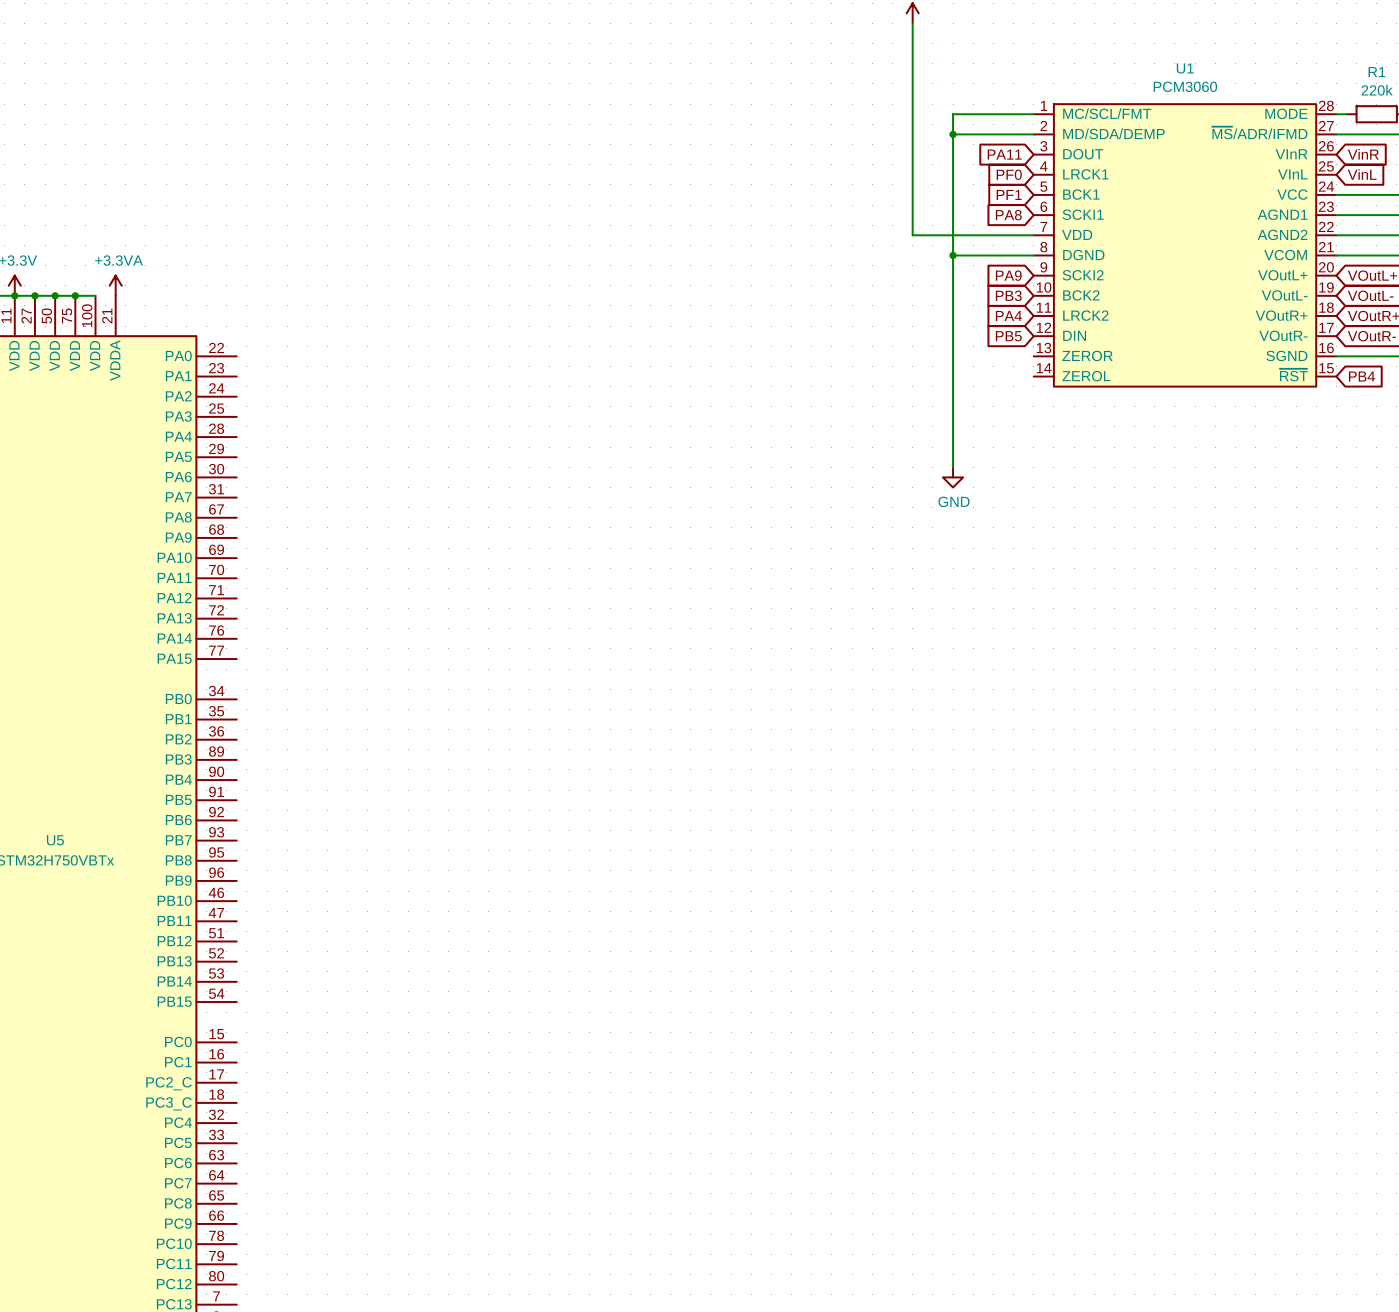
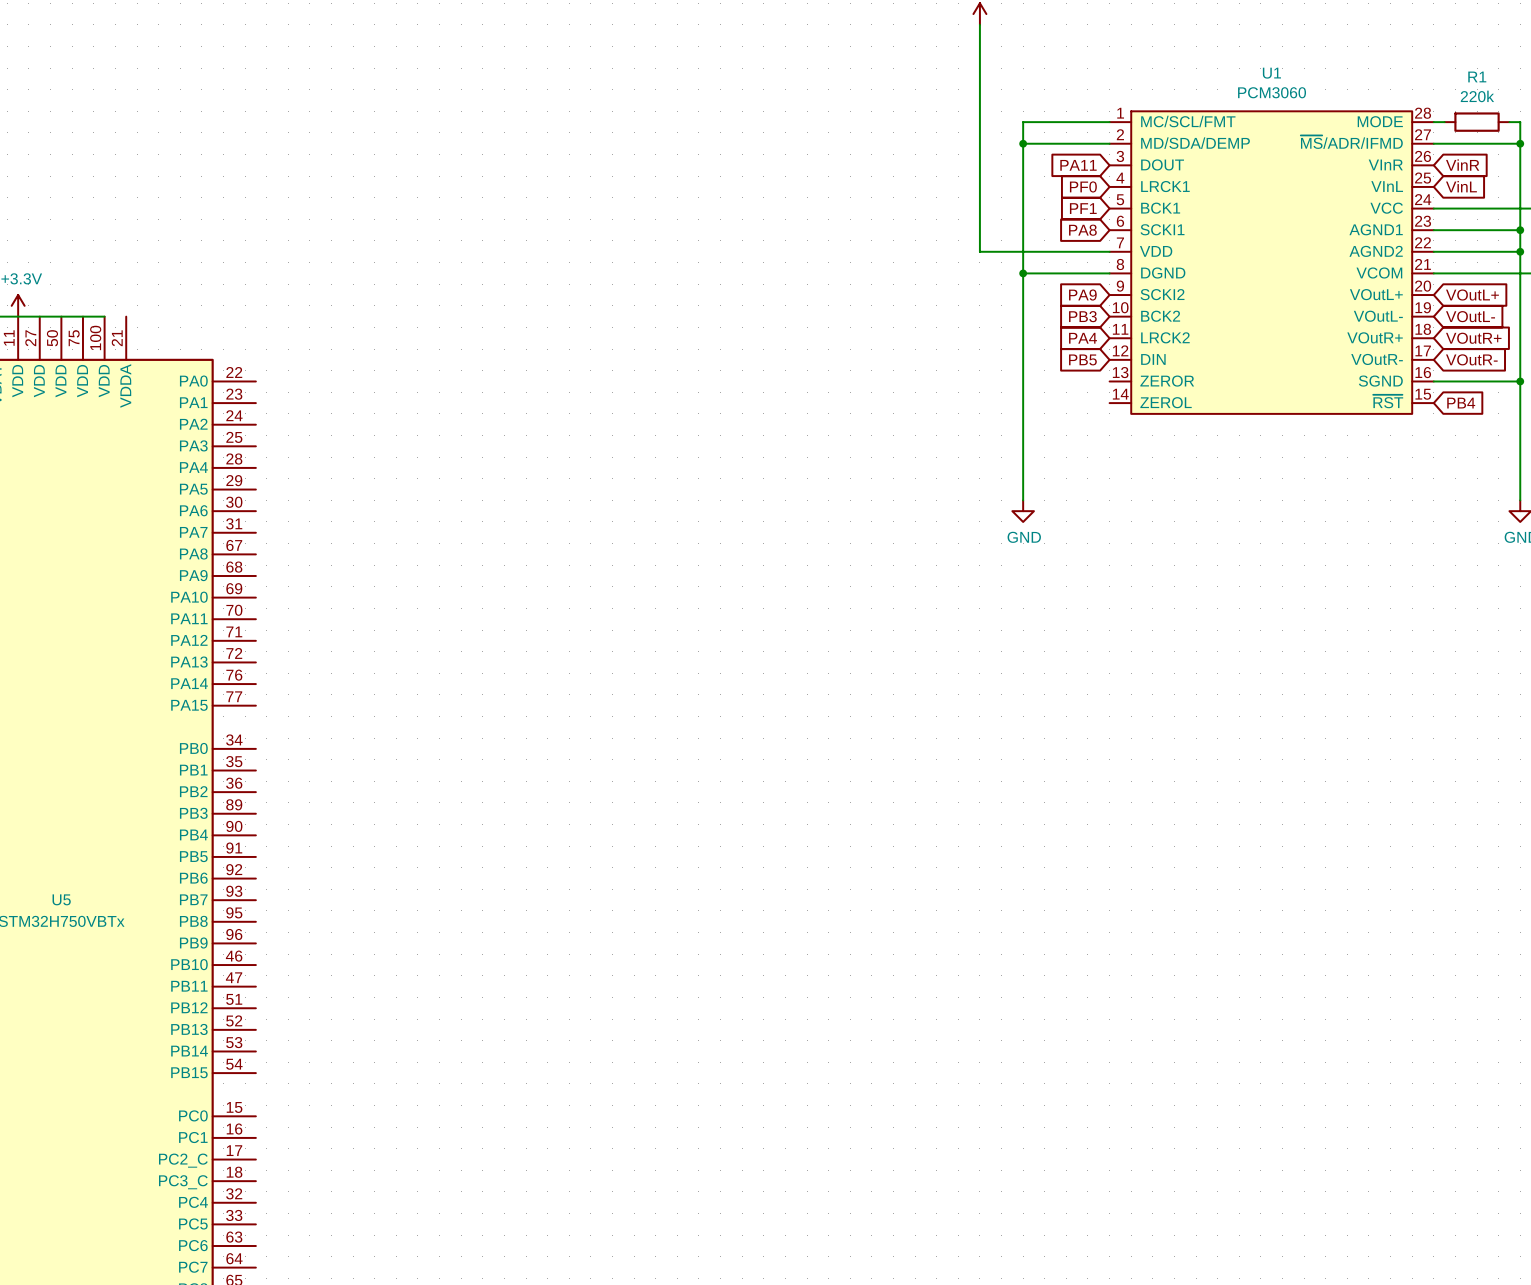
power symbol: +3.3VA (115, 285) -> none
junction: (14, 295) -> none
junction: (34, 295) -> none
junction: (55, 295) -> none
junction: (75, 295) -> none

